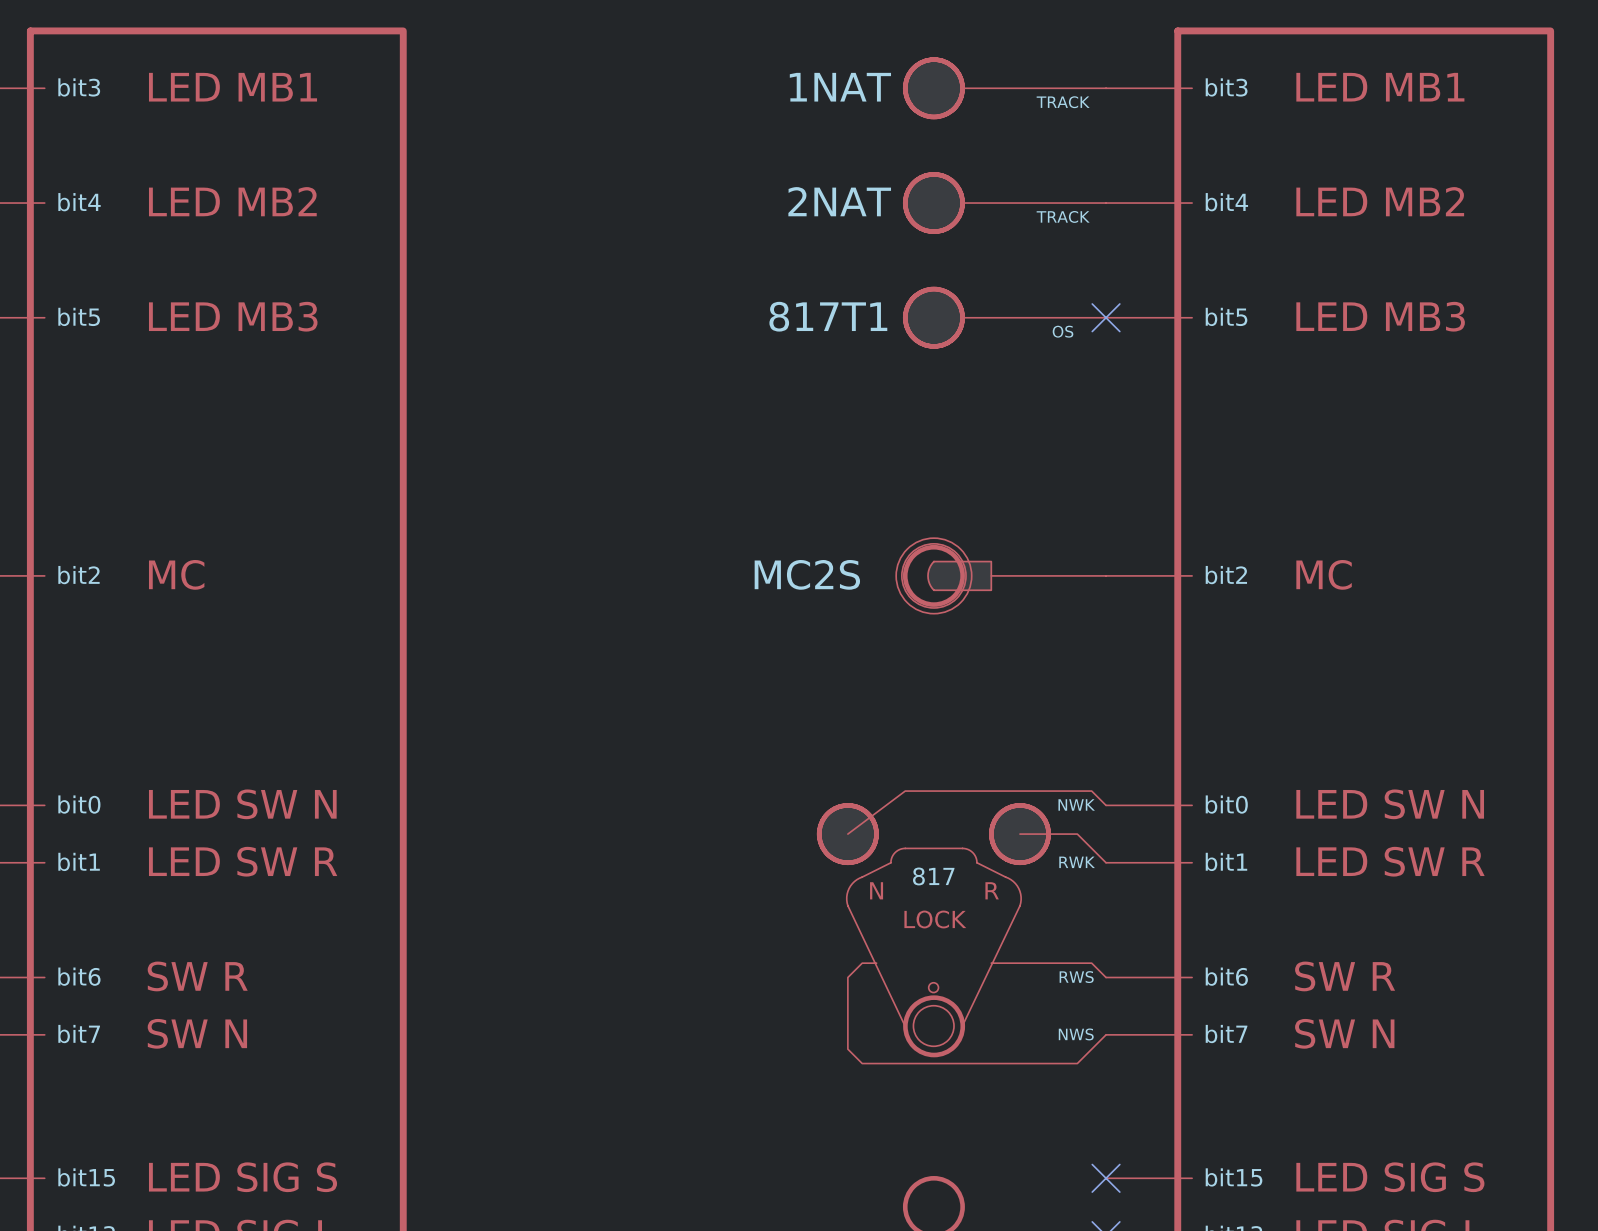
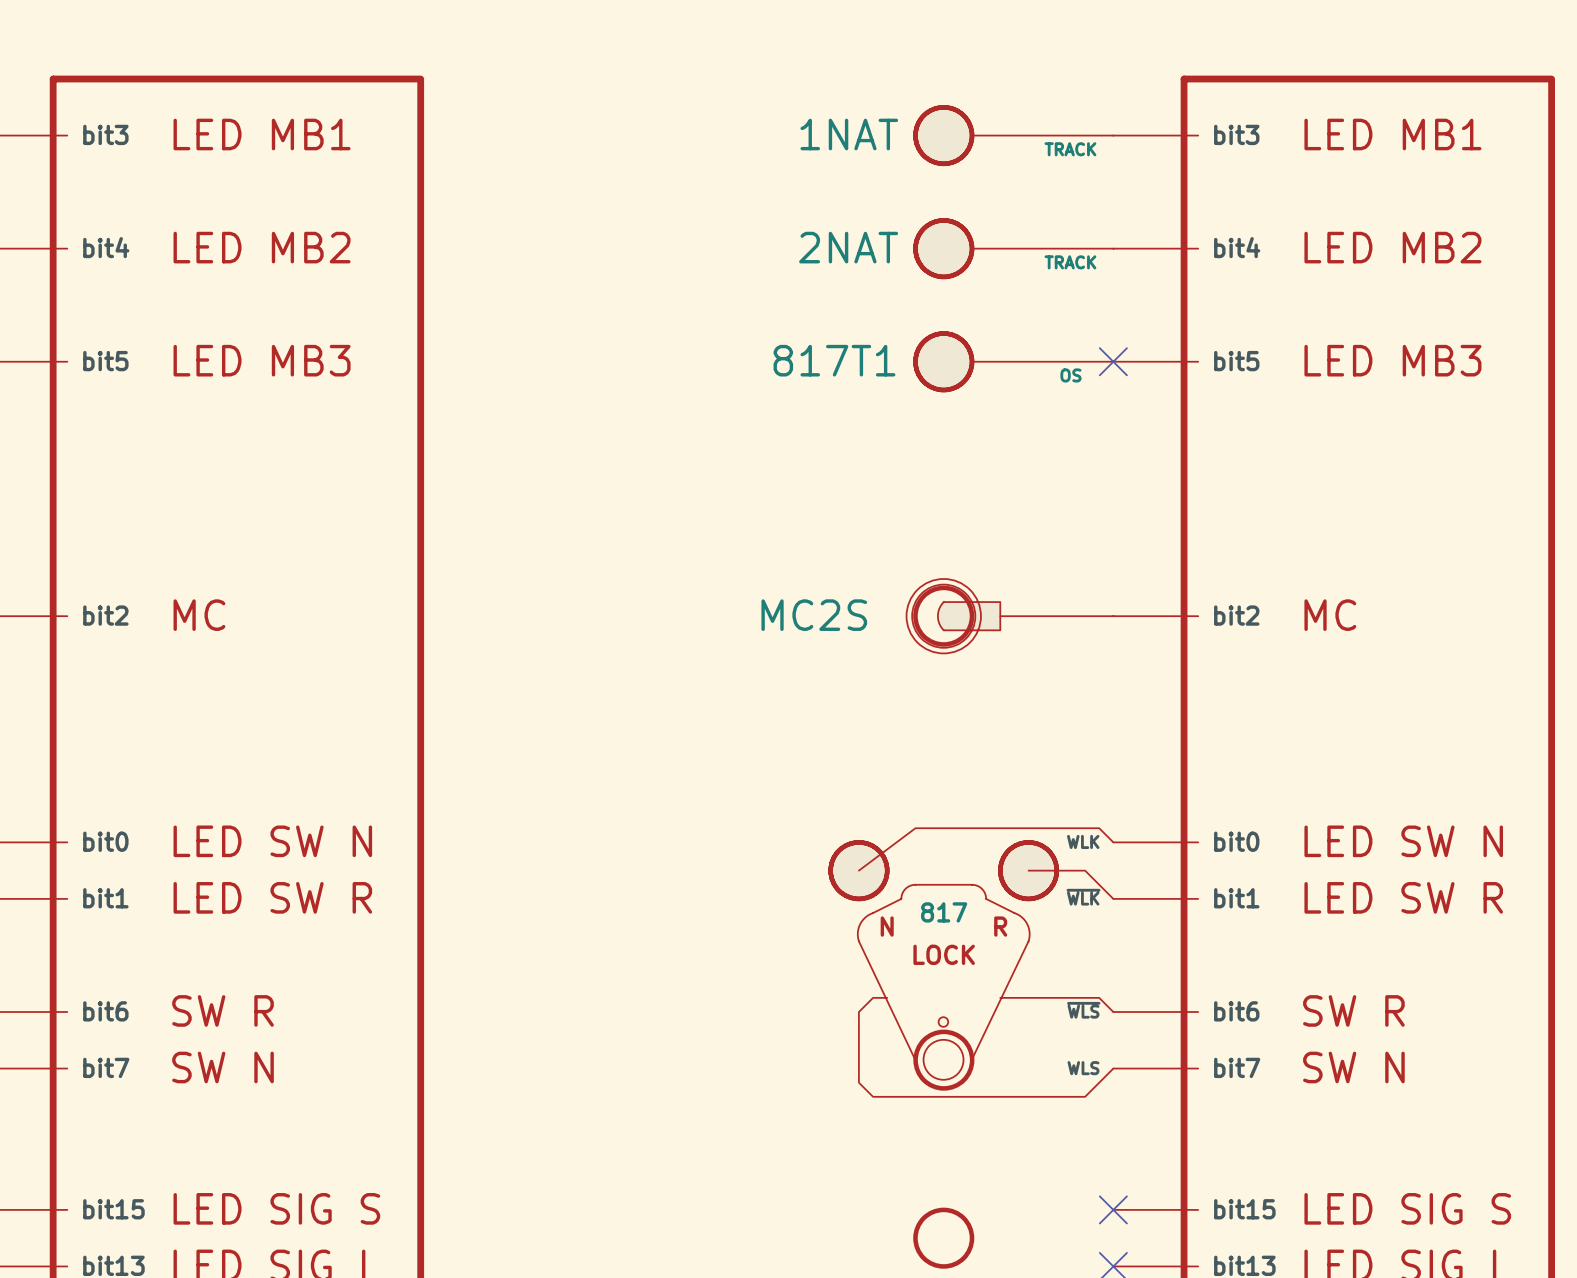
part pin name: NWK (1076, 804) -> WLK (1083, 841)
part pin name: RWK (1077, 862) -> ~{WLK} (1083, 897)
part pin name: RWS (1076, 977) -> ~{WLS} (1083, 1010)
part pin name: NWS (1076, 1034) -> WLS (1083, 1068)

